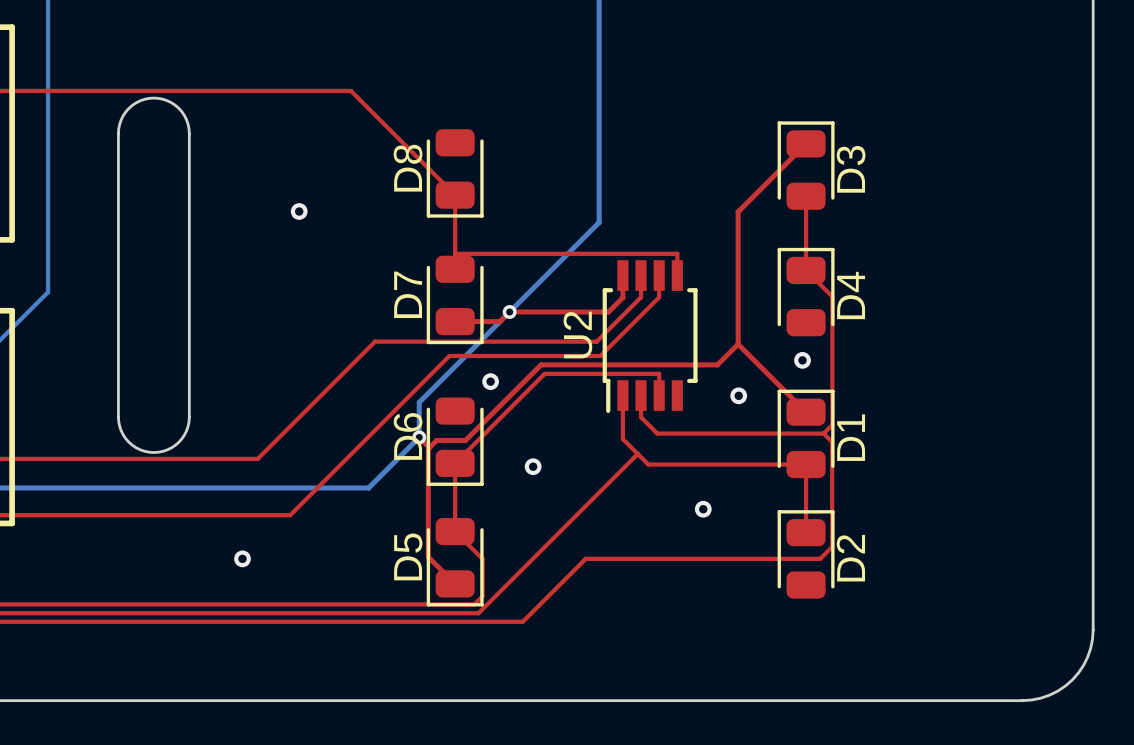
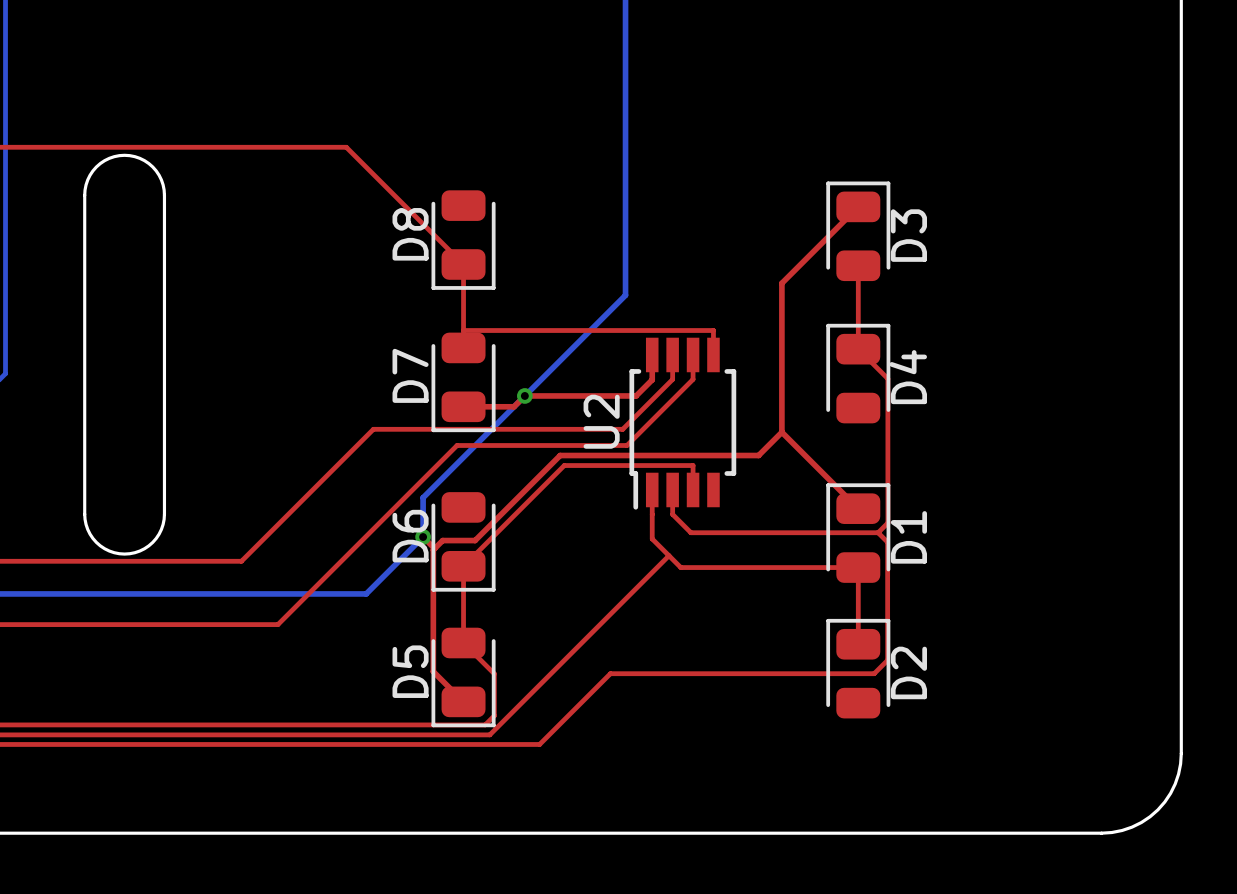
via: (299, 211) -> none
via: (802, 360) -> none
via: (490, 381) -> none
via: (738, 395) -> none
via: (533, 466) -> none
via: (703, 509) -> none
via: (242, 558) -> none

